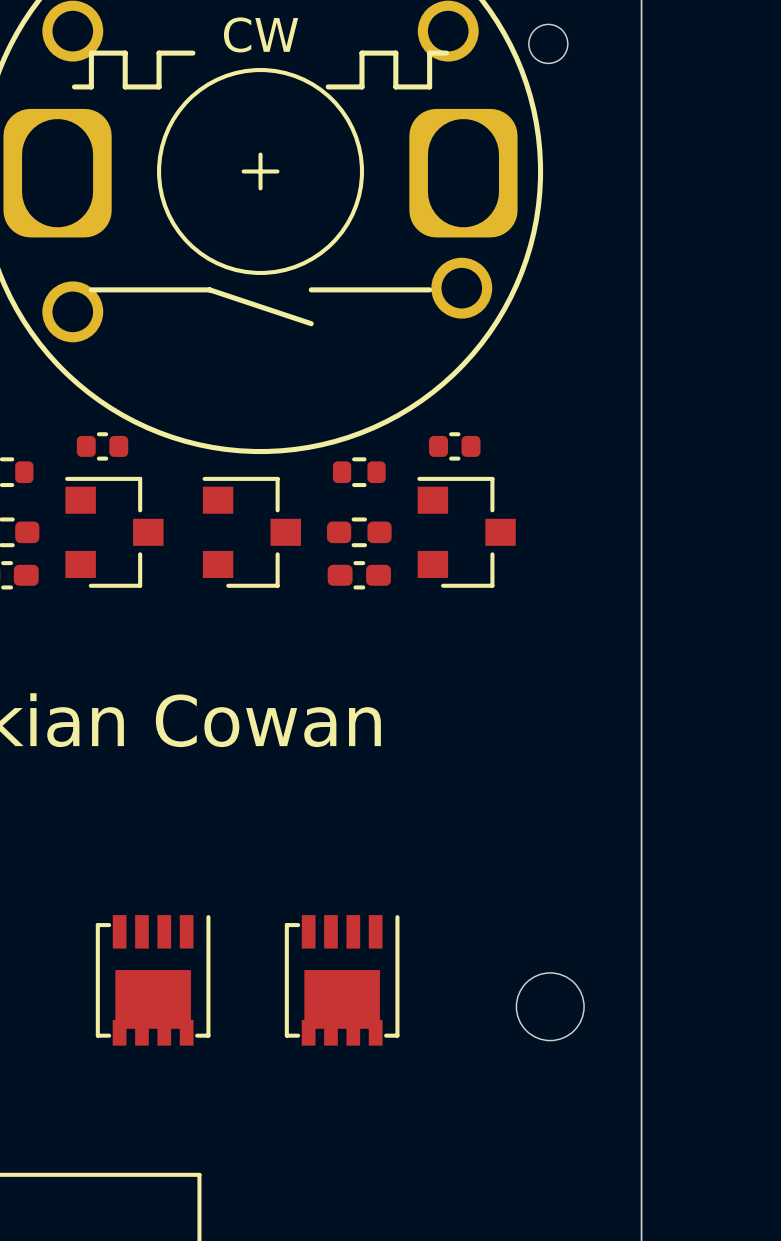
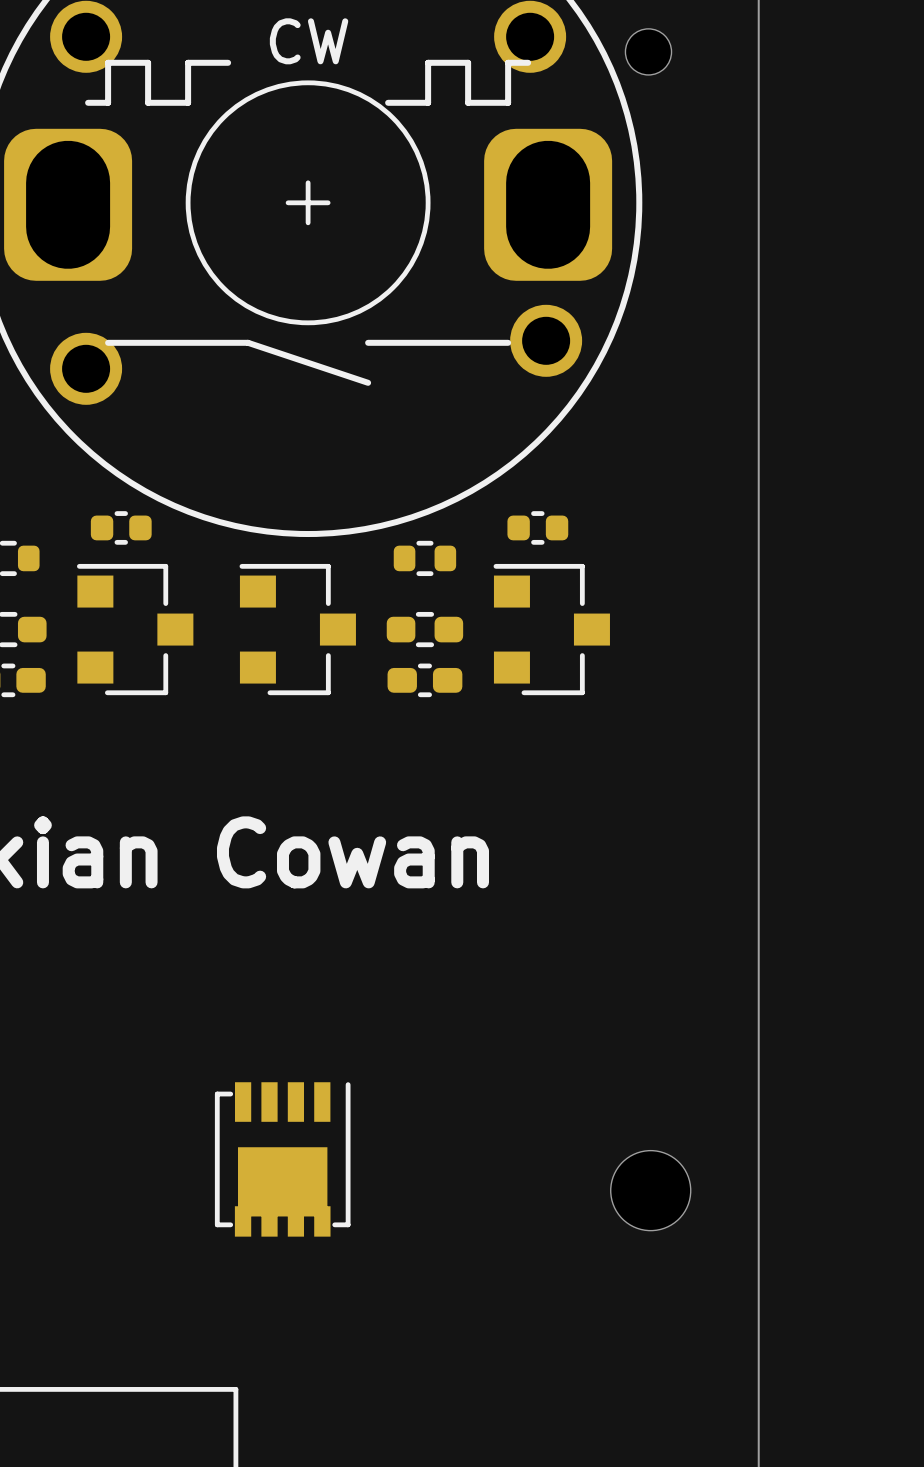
part: (153, 980) -> none
part: none -> (282, 1159)
part: (342, 980) -> none

